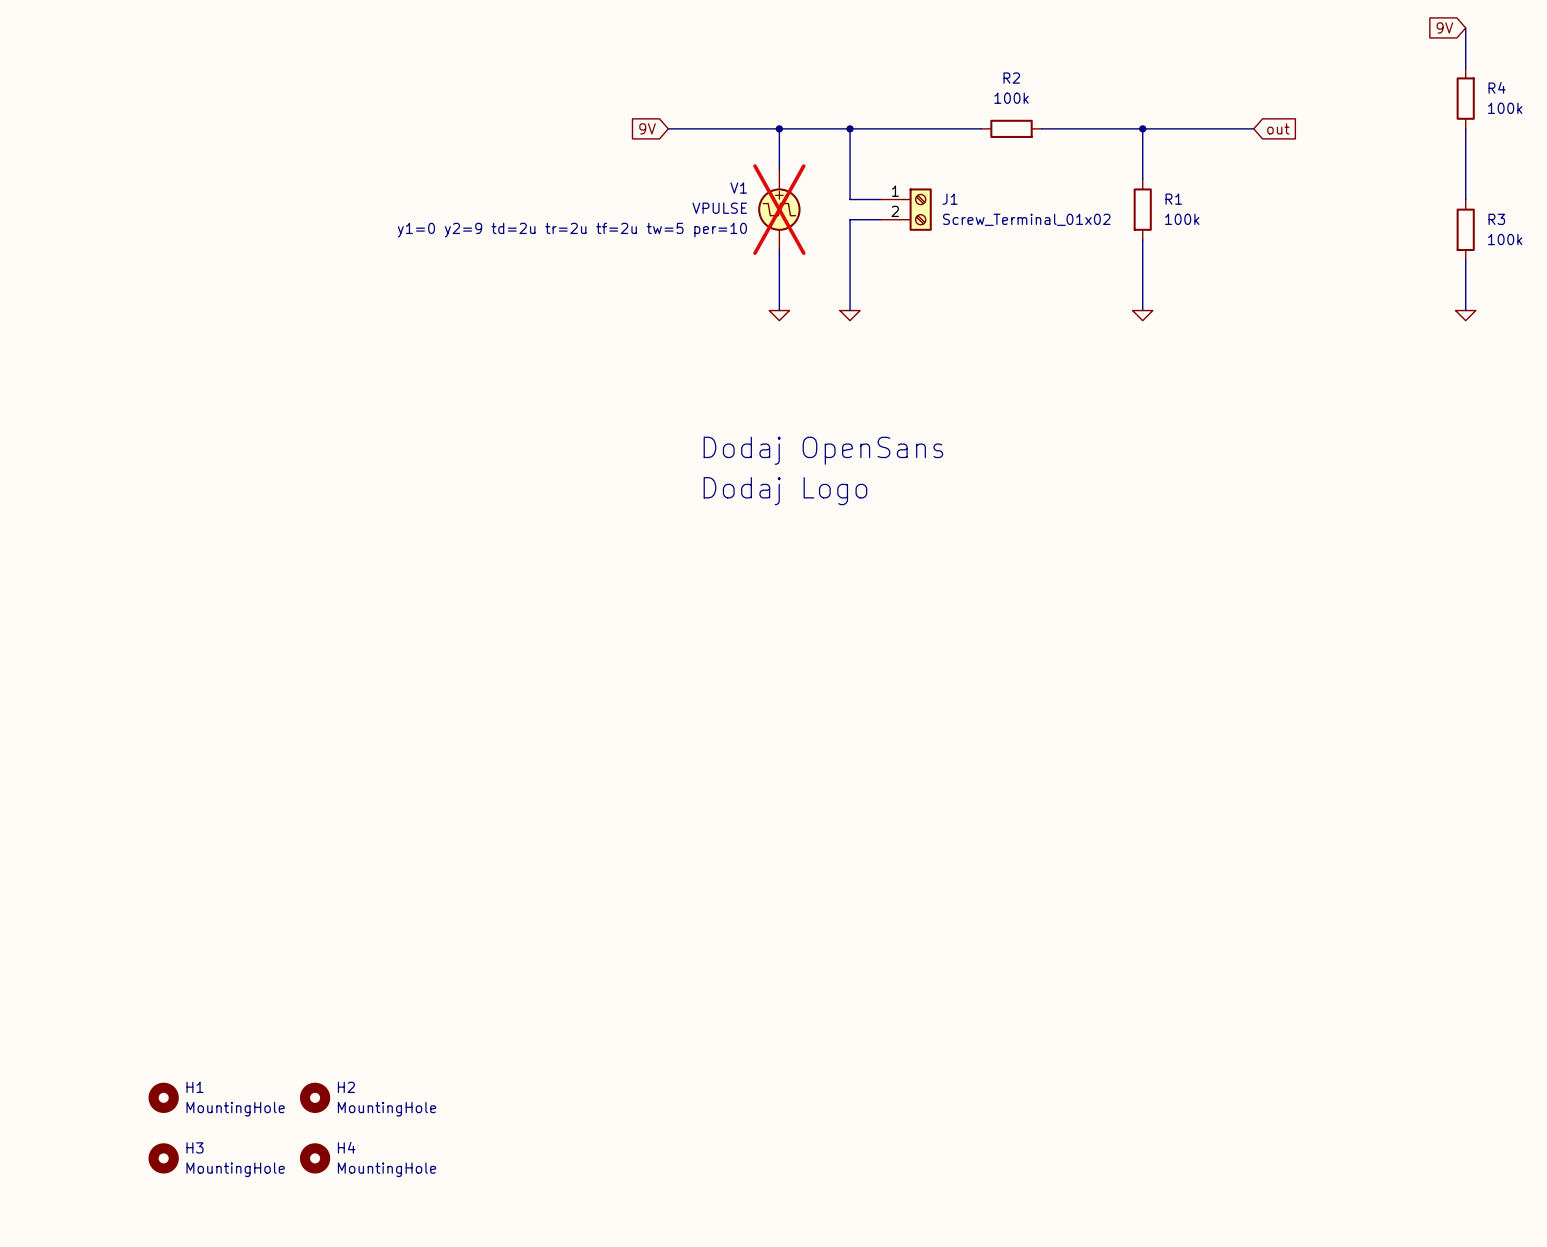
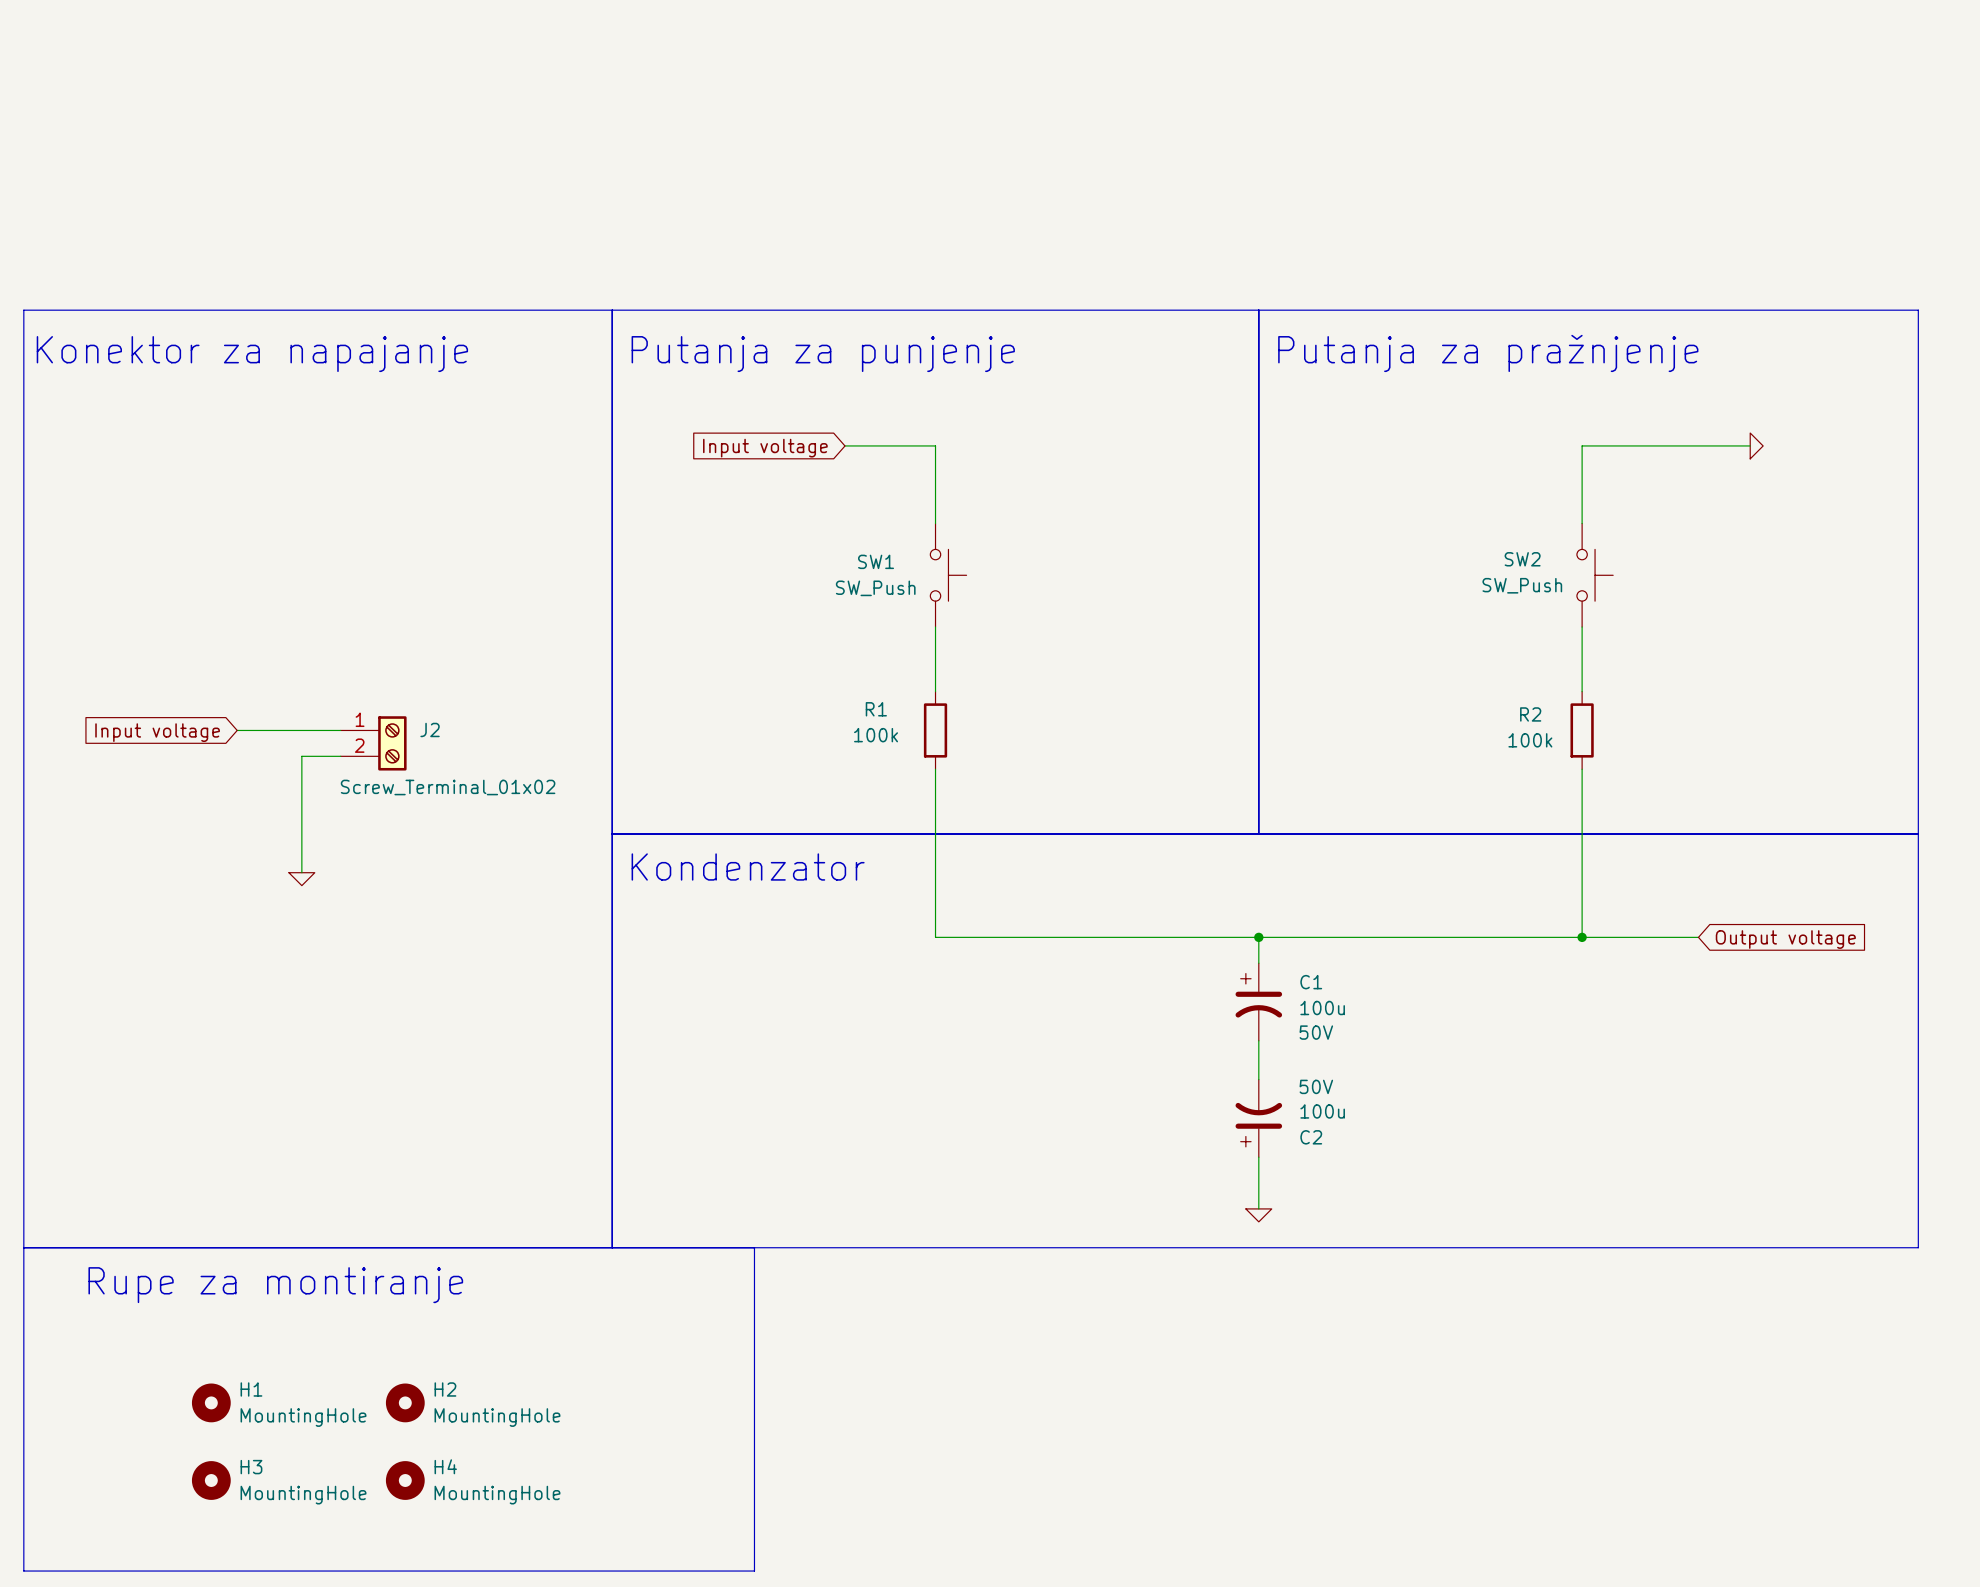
global label: 9V (1444, 27) -> none
wire: (1465, 27) (1465, 68) -> none
R2 name position: R2 (1011, 78) -> R2 (1530, 714)
R2 value position: 100k (1011, 98) -> 100k (1530, 740)
R4: 100k (1465, 98) -> none
global label: 9V (647, 128) -> none
wire: (668, 128) (981, 128) -> none
wire: (779, 128) (779, 169) -> none
junction: (779, 128) -> none
wire: (850, 128) (850, 199) (880, 199) -> none
junction: (850, 128) -> none
R2 rotation: 0° (1011, 128) -> 90° clockwise (1582, 730)
R2 position: (1011, 128) -> (1582, 730)
wire: (1041, 128) (1253, 128) -> none
wire: (1142, 128) (1142, 179) -> none
junction: (1142, 128) -> none
global label: out (1278, 128) -> none
wire: (1465, 128) (1465, 199) -> none
R1 name position: R1 (1173, 199) -> R1 (876, 709)
V1: VPULSE (779, 209) -> none
J1: Screw_Terminal_01x02 (906, 209) -> none
R1 position: (1142, 209) -> (935, 730)
wire: (880, 219) (850, 219) (850, 310) -> none
R1 value position: 100k (1182, 219) -> 100k (876, 735)
R3: 100k (1465, 229) -> none
wire: (1142, 239) (1142, 310) -> none
line: none -> (612, 310) (612, 1247)
line: none -> (1258, 310) (1258, 833)
wire: (779, 250) (779, 310) -> none
wire: (1465, 260) (1465, 310) -> none
text: none -> Putanja za pražnjenje (1488, 353)
text: none -> Konektor za napajanje (252, 354)
text: none -> Putanja za punjenje (823, 354)
power symbol: (779, 315) -> none
power symbol: (850, 315) -> none
power symbol: (1142, 315) -> none
power symbol rotation: 0° (1465, 315) -> 90° counterclockwise (1756, 445)
power symbol position: (1465, 315) -> (1756, 445)
wire: none -> (844, 445) (935, 445) (935, 523)
wire: none -> (1750, 445) (1582, 445) (1582, 523)
global label: none -> Input voltage (765, 448)
text: Dodaj OpenSans (823, 450) -> none
SW1: none -> SW_Push (948, 575)
SW2: none -> SW_Push (1595, 575)
text: Dodaj Logo (785, 491) -> none
wire: none -> (935, 627) (935, 691)
wire: none -> (1582, 627) (1582, 691)
wire: none -> (237, 730) (340, 730)
global label: none -> Input voltage (157, 732)
J2: none -> Screw_Terminal_01x02 (373, 743)
wire: none -> (340, 756) (301, 756) (301, 872)
wire: none -> (935, 769) (935, 937) (1698, 937)
wire: none -> (1582, 769) (1582, 937)
line: none -> (612, 833) (1918, 833)
text: none -> Kondenzator (748, 867)
power symbol: none -> (301, 879)
wire: none -> (1258, 937) (1258, 963)
junction: none -> (1258, 937)
junction: none -> (1582, 937)
global label: none -> Output voltage (1785, 939)
C1: none -> 100u (1258, 1002)
wire: none -> (1258, 1040) (1258, 1079)
C2: none -> 100u (1258, 1118)
wire: none -> (1258, 1157) (1258, 1208)
power symbol: none -> (1258, 1215)
line: none -> (23, 1247) (1918, 1247) (1918, 310) (23, 310) (23, 1571) (754, 1571) (754, 1247)
text: none -> Rupe za montiranje (275, 1285)

